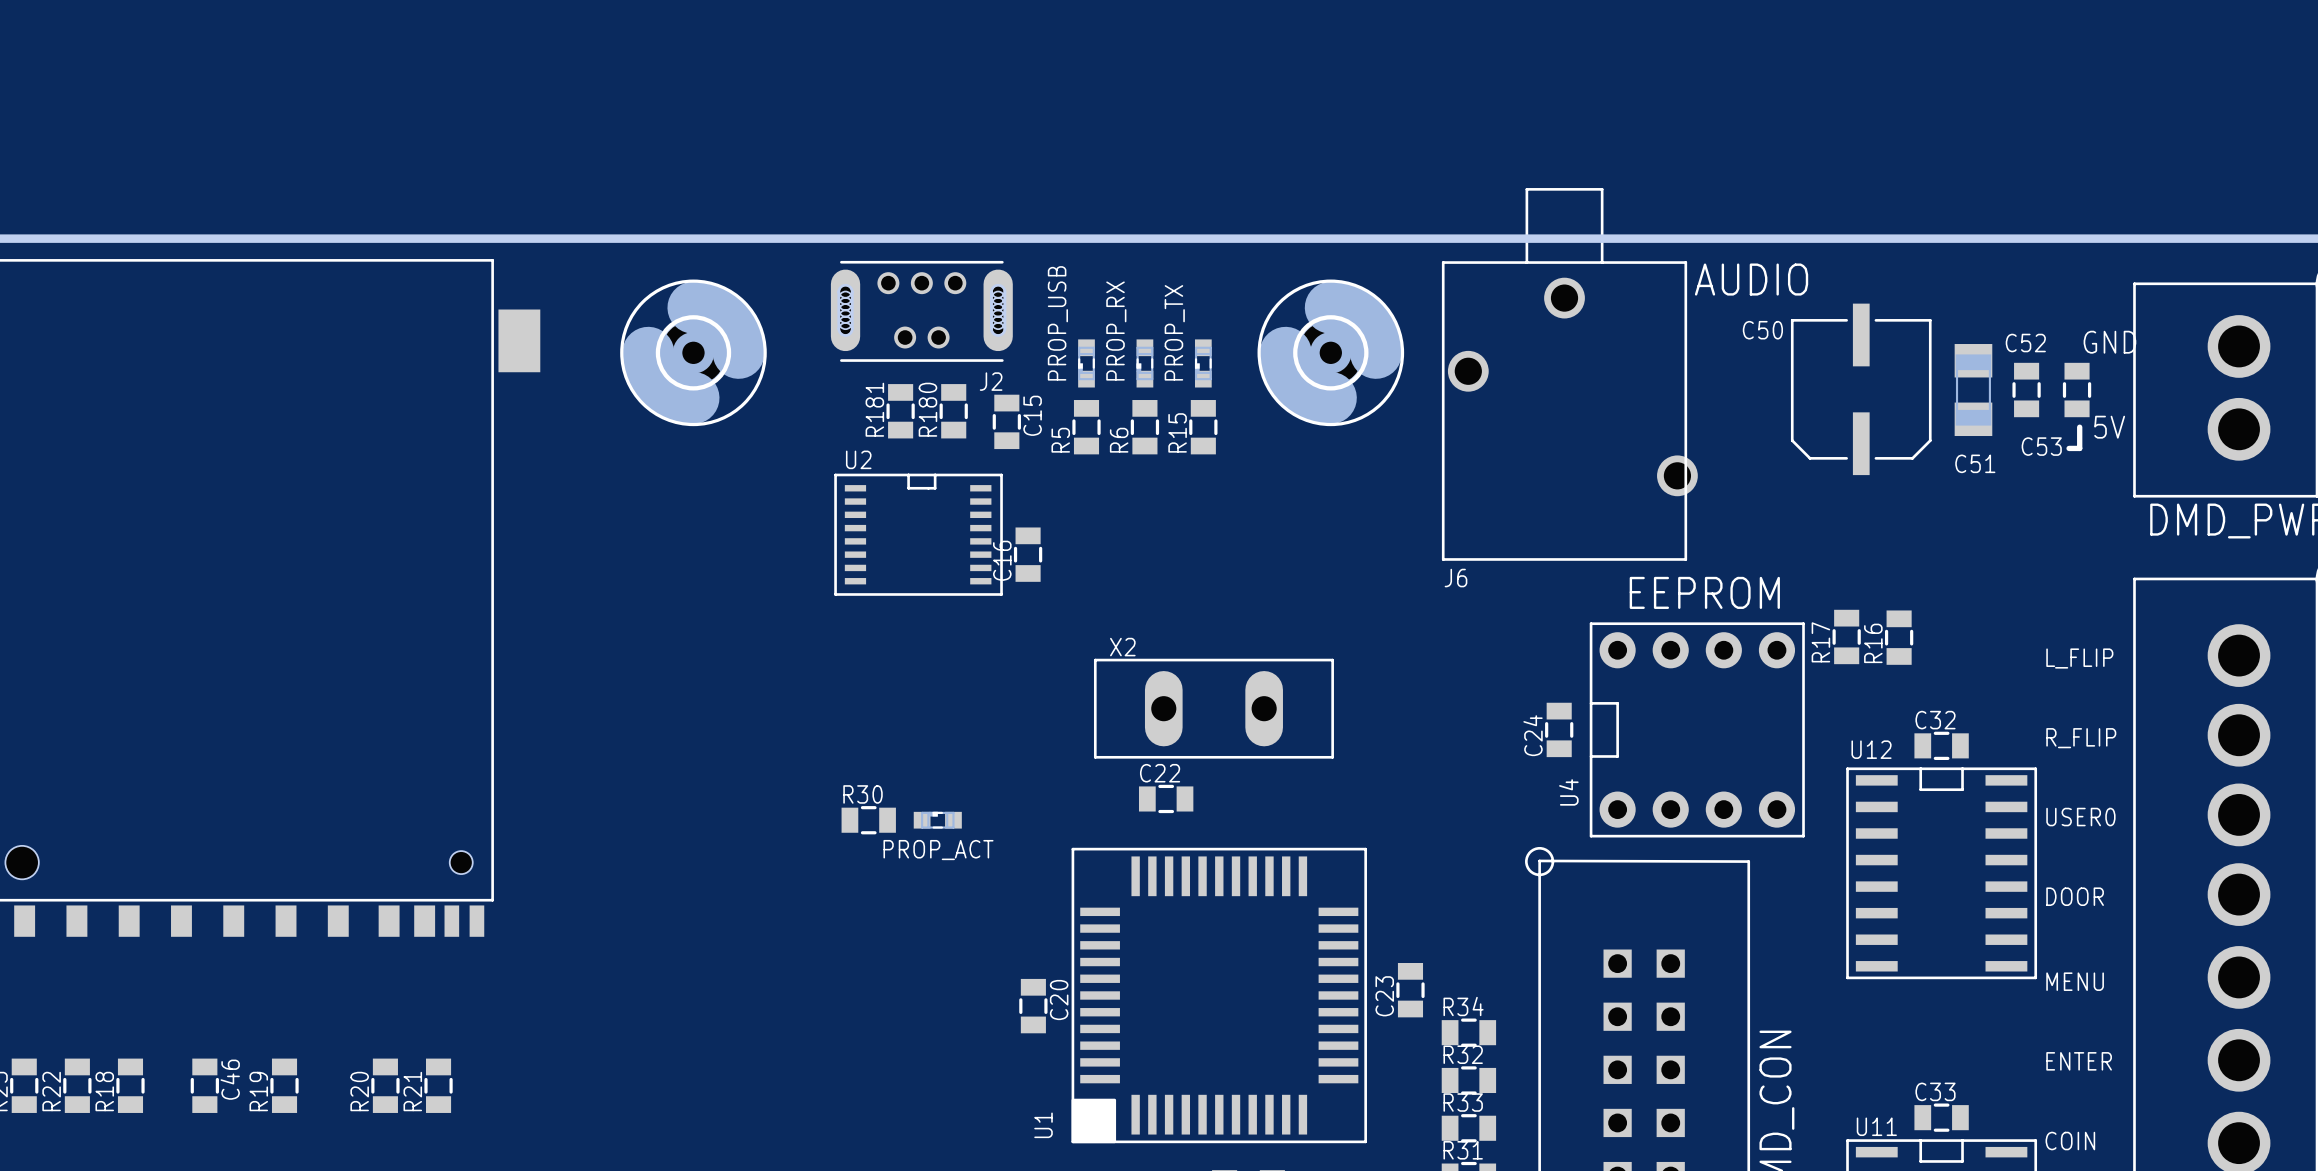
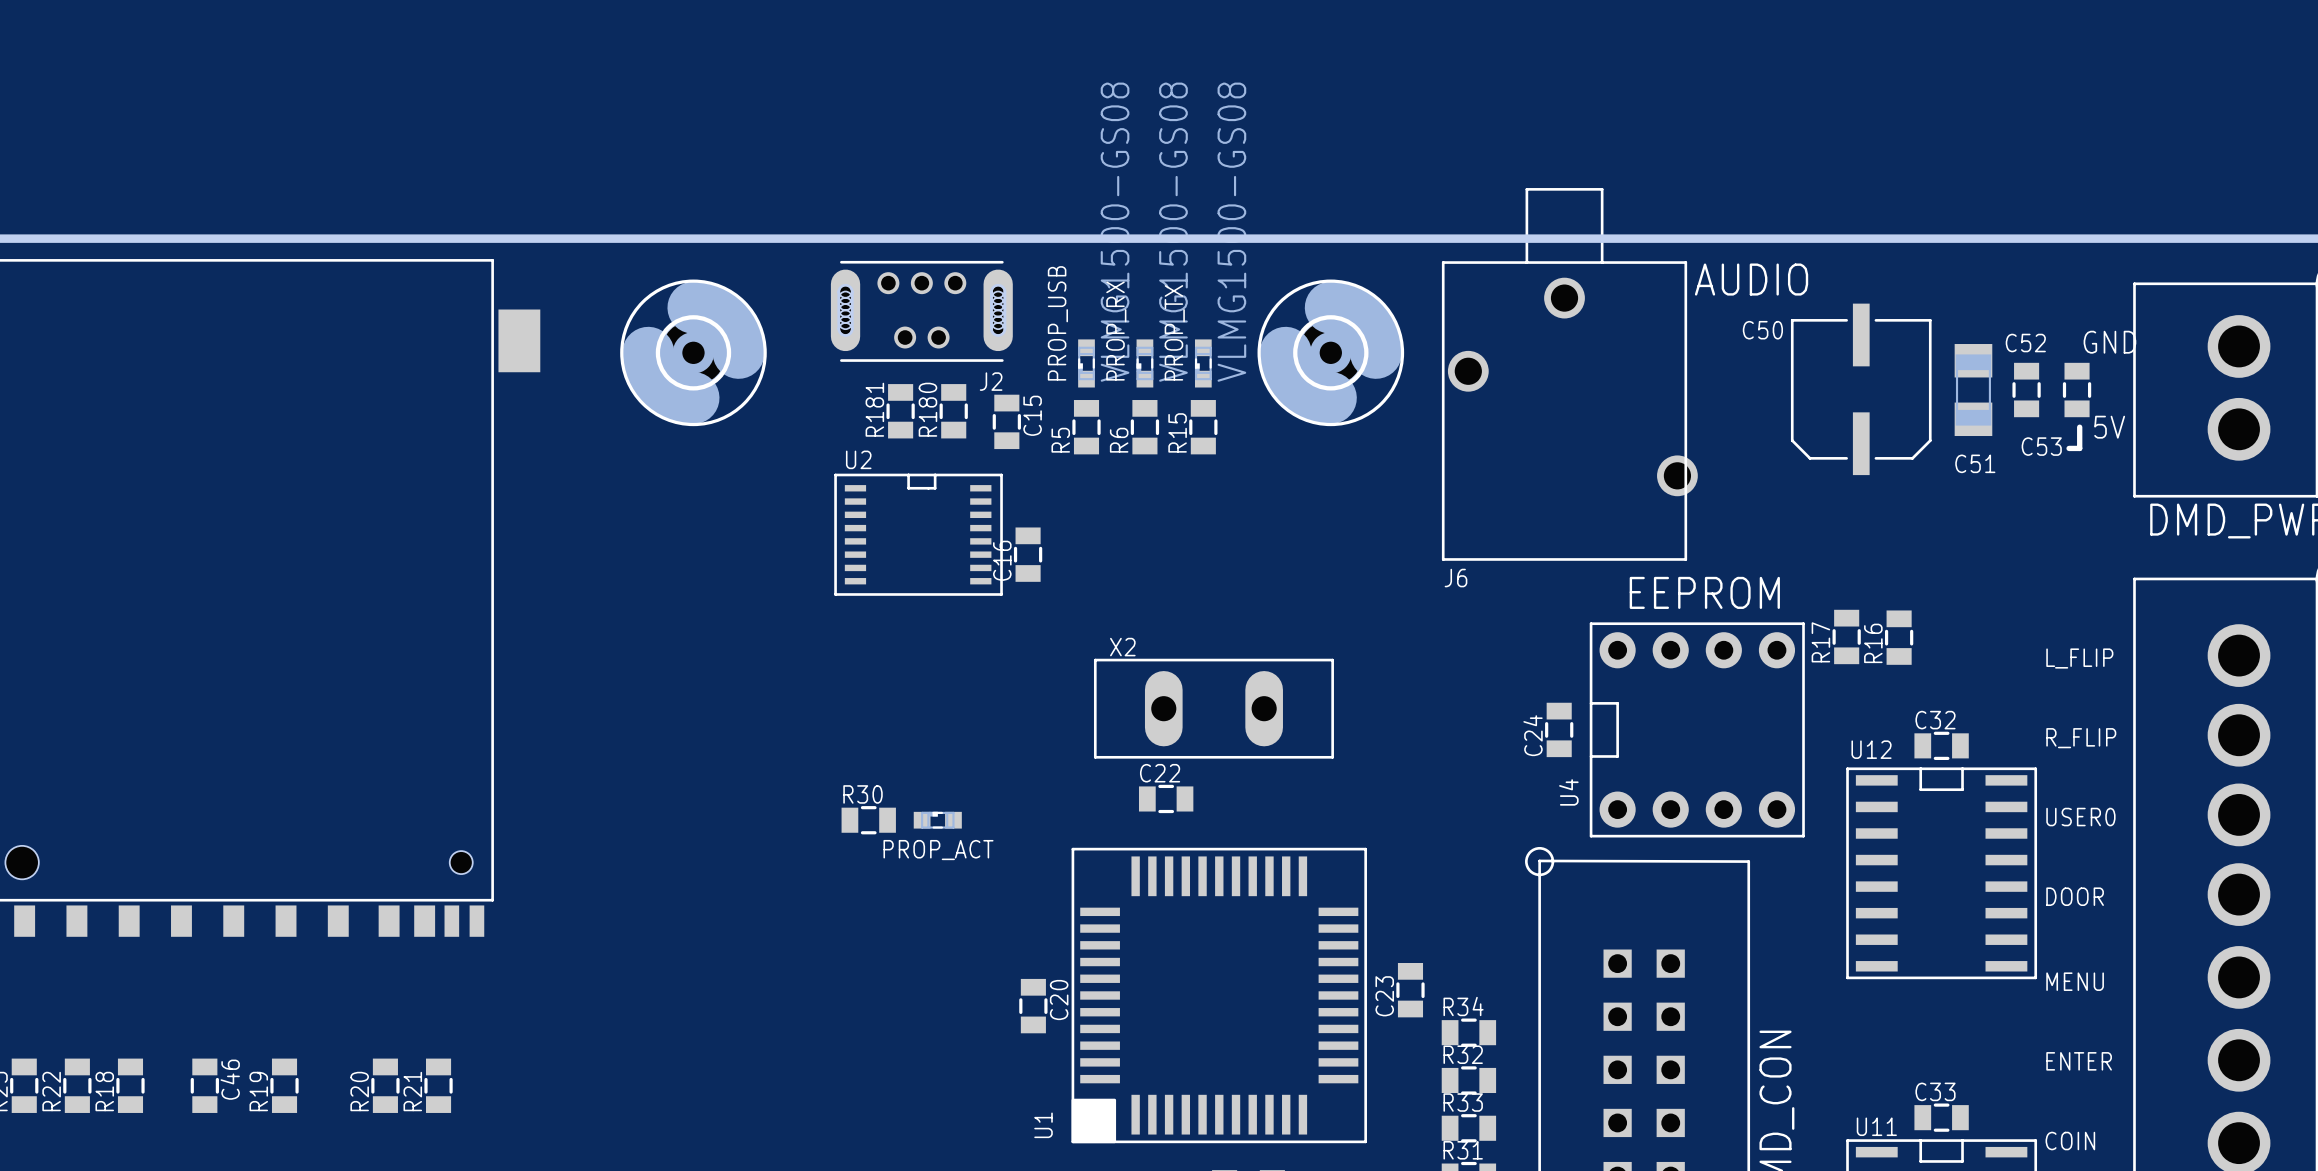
PROP_USB value: none -> VLMG1500-GS08 (1115, 232)
PROP_RX value: none -> VLMG1500-GS08 (1173, 232)
PROP_TX value: none -> VLMG1500-GS08 (1231, 232)

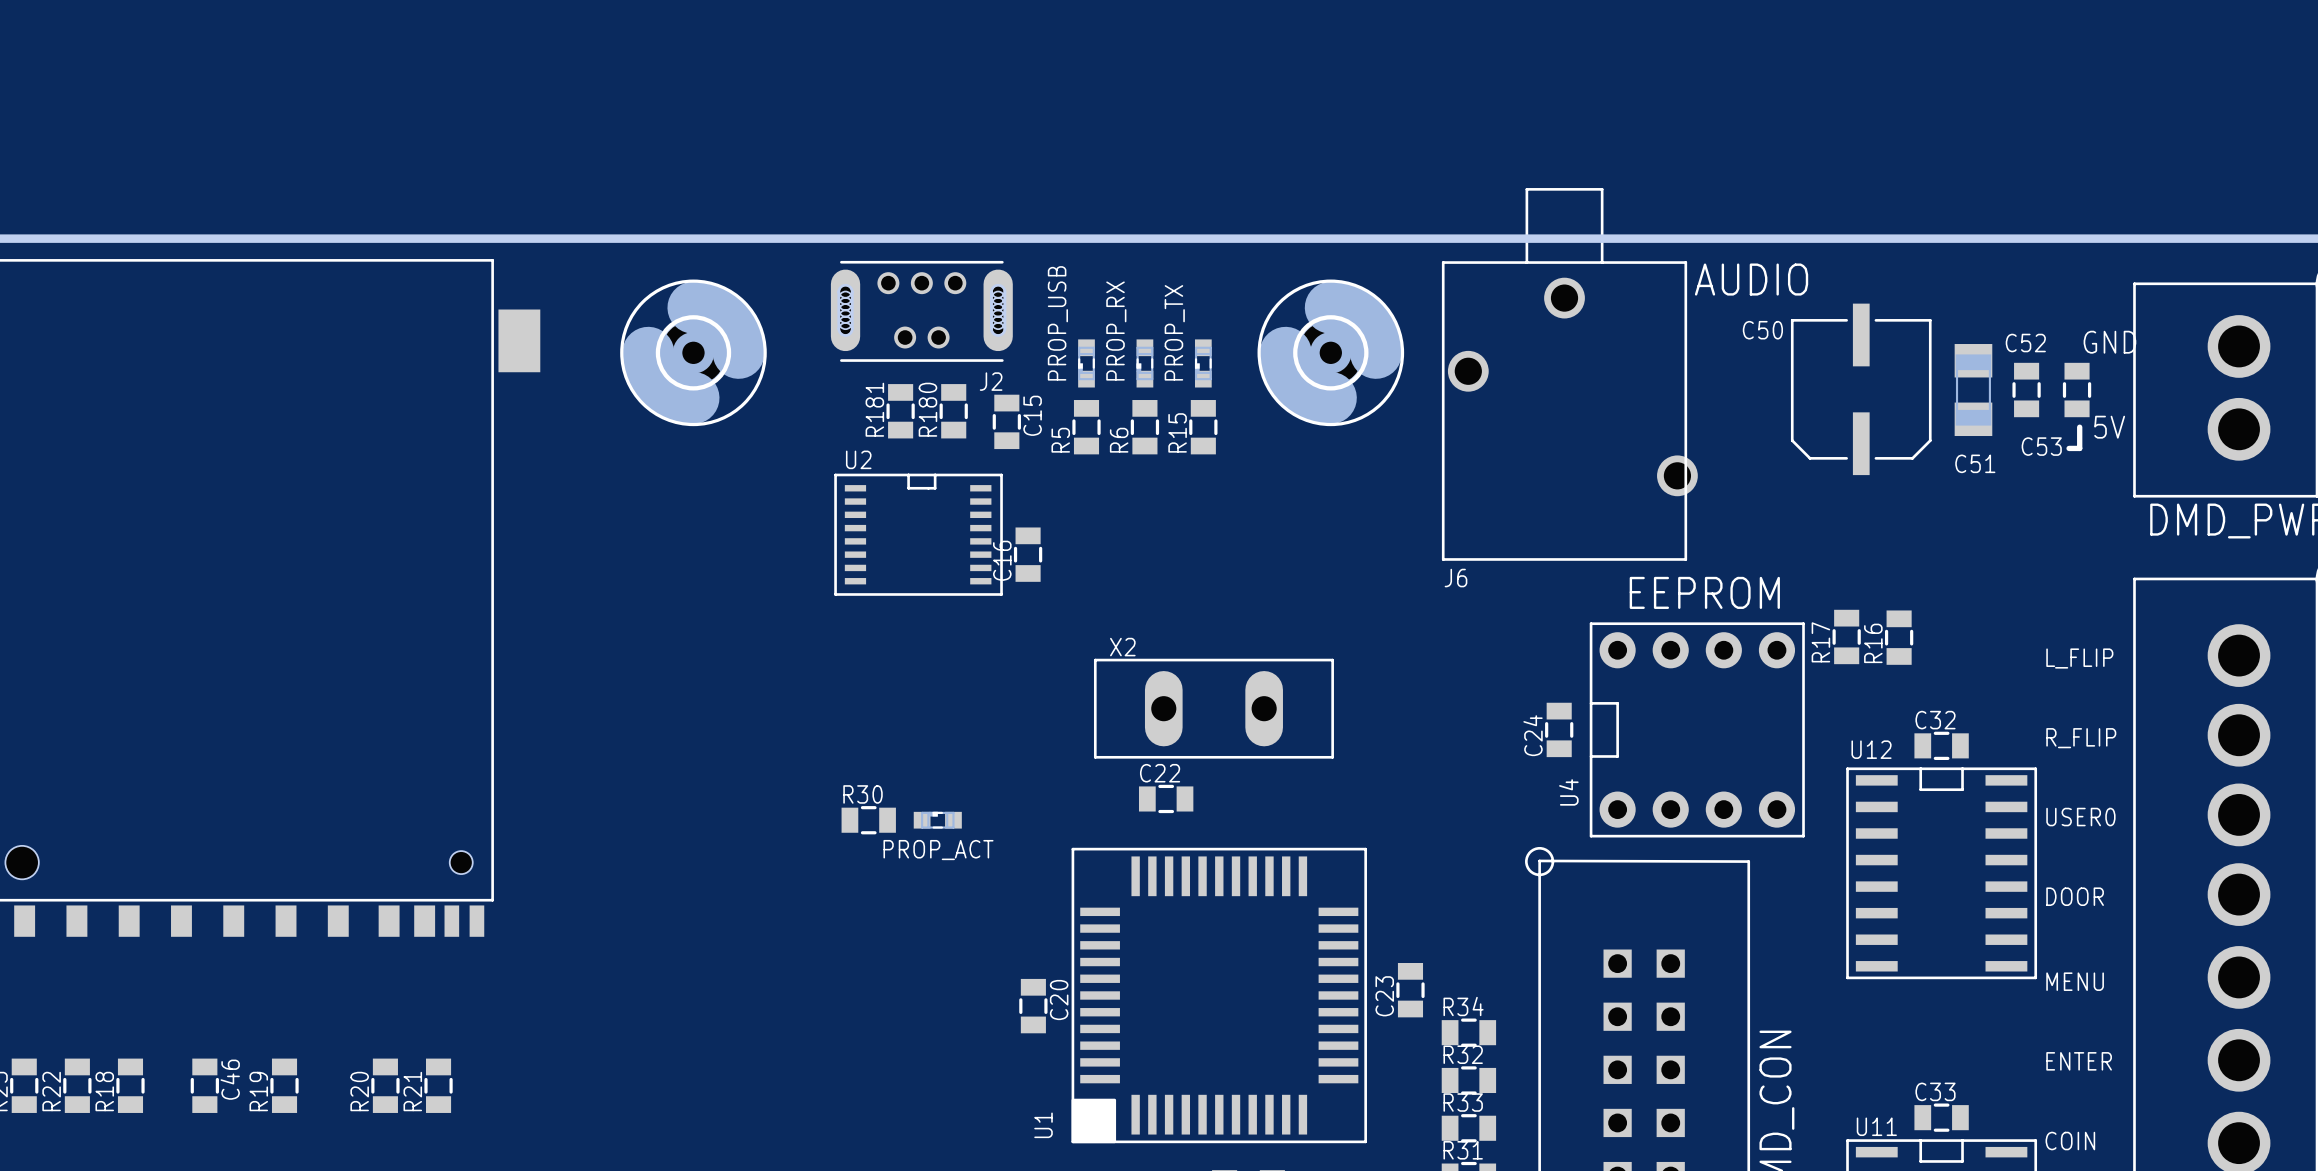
PROP_USB value: VLMG1500-GS08 (1115, 232) -> none
PROP_RX value: VLMG1500-GS08 (1173, 232) -> none
PROP_TX value: VLMG1500-GS08 (1231, 232) -> none

